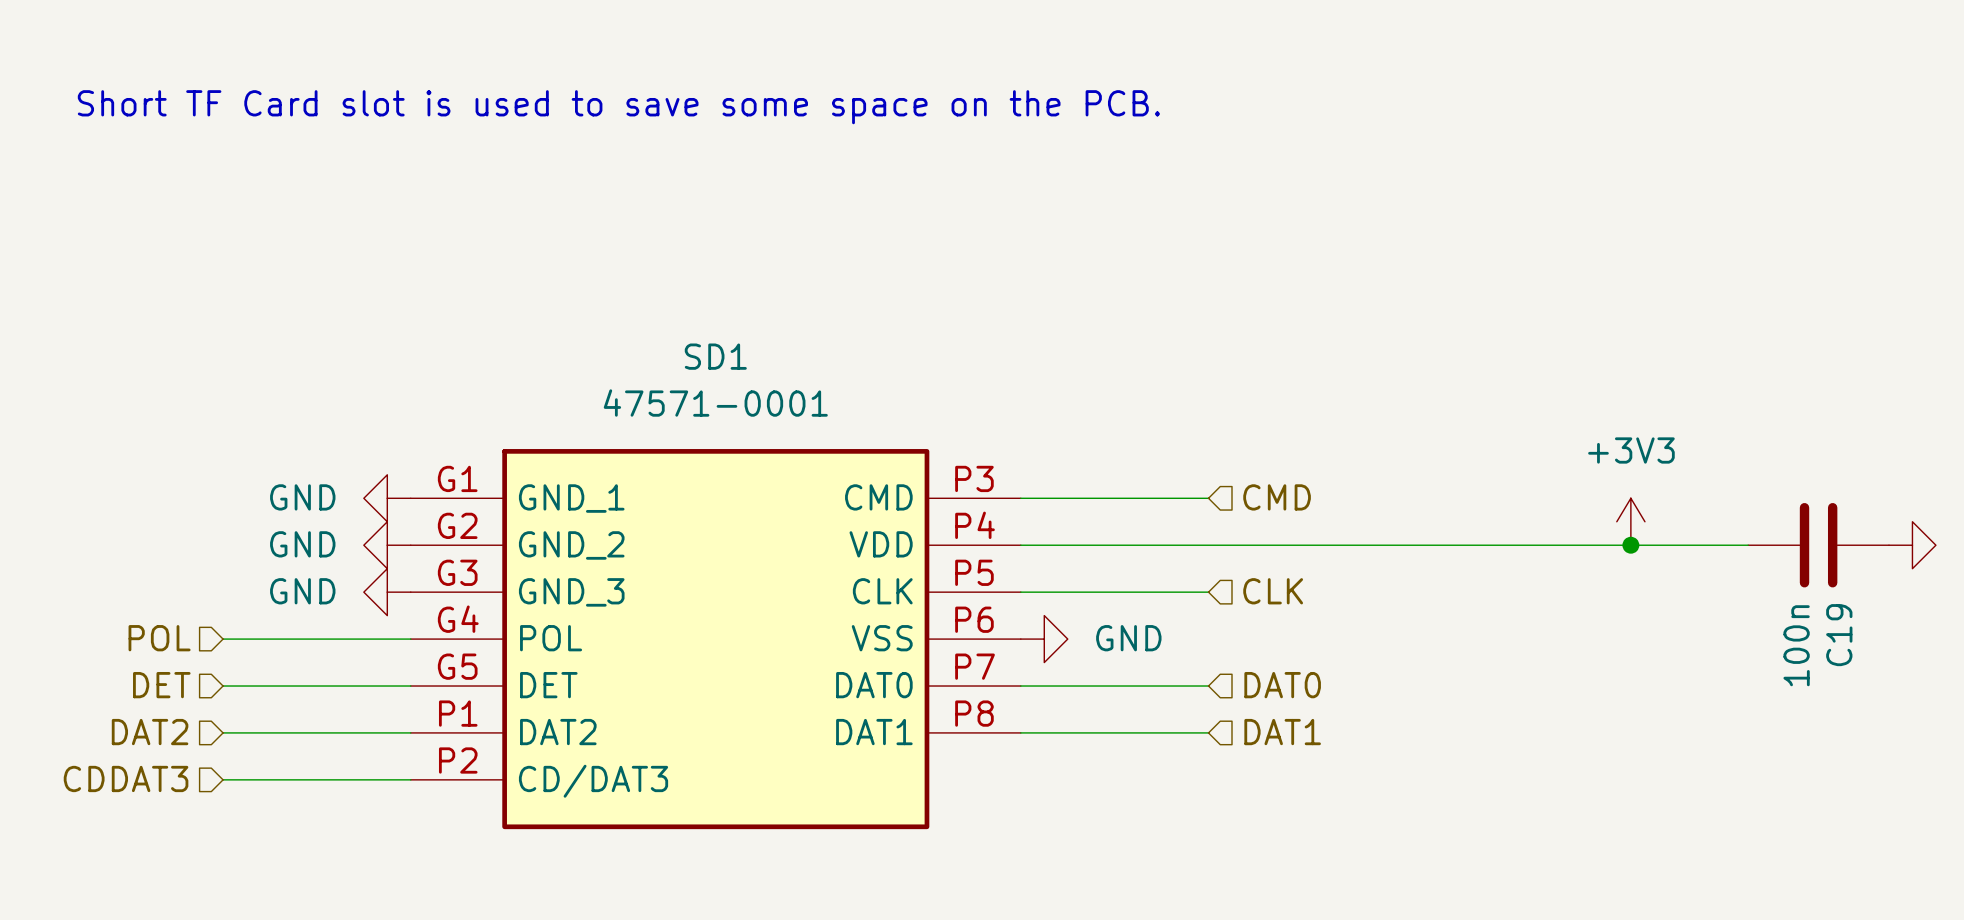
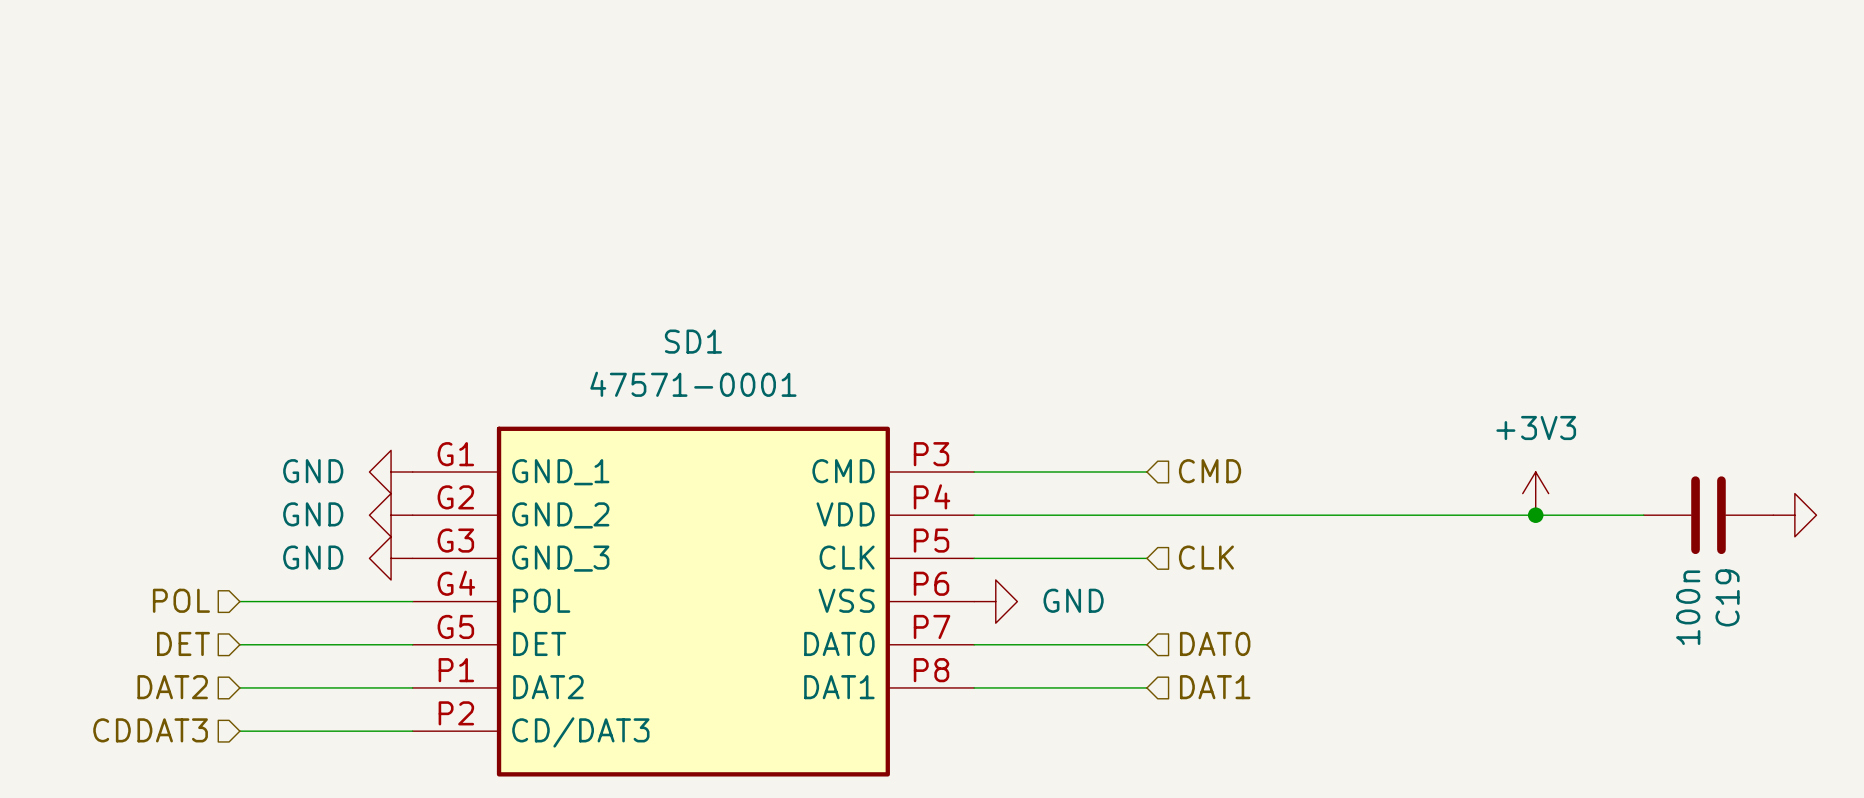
text: Short TF Card slot is used to save some space on the PCB. (618, 107) -> none

